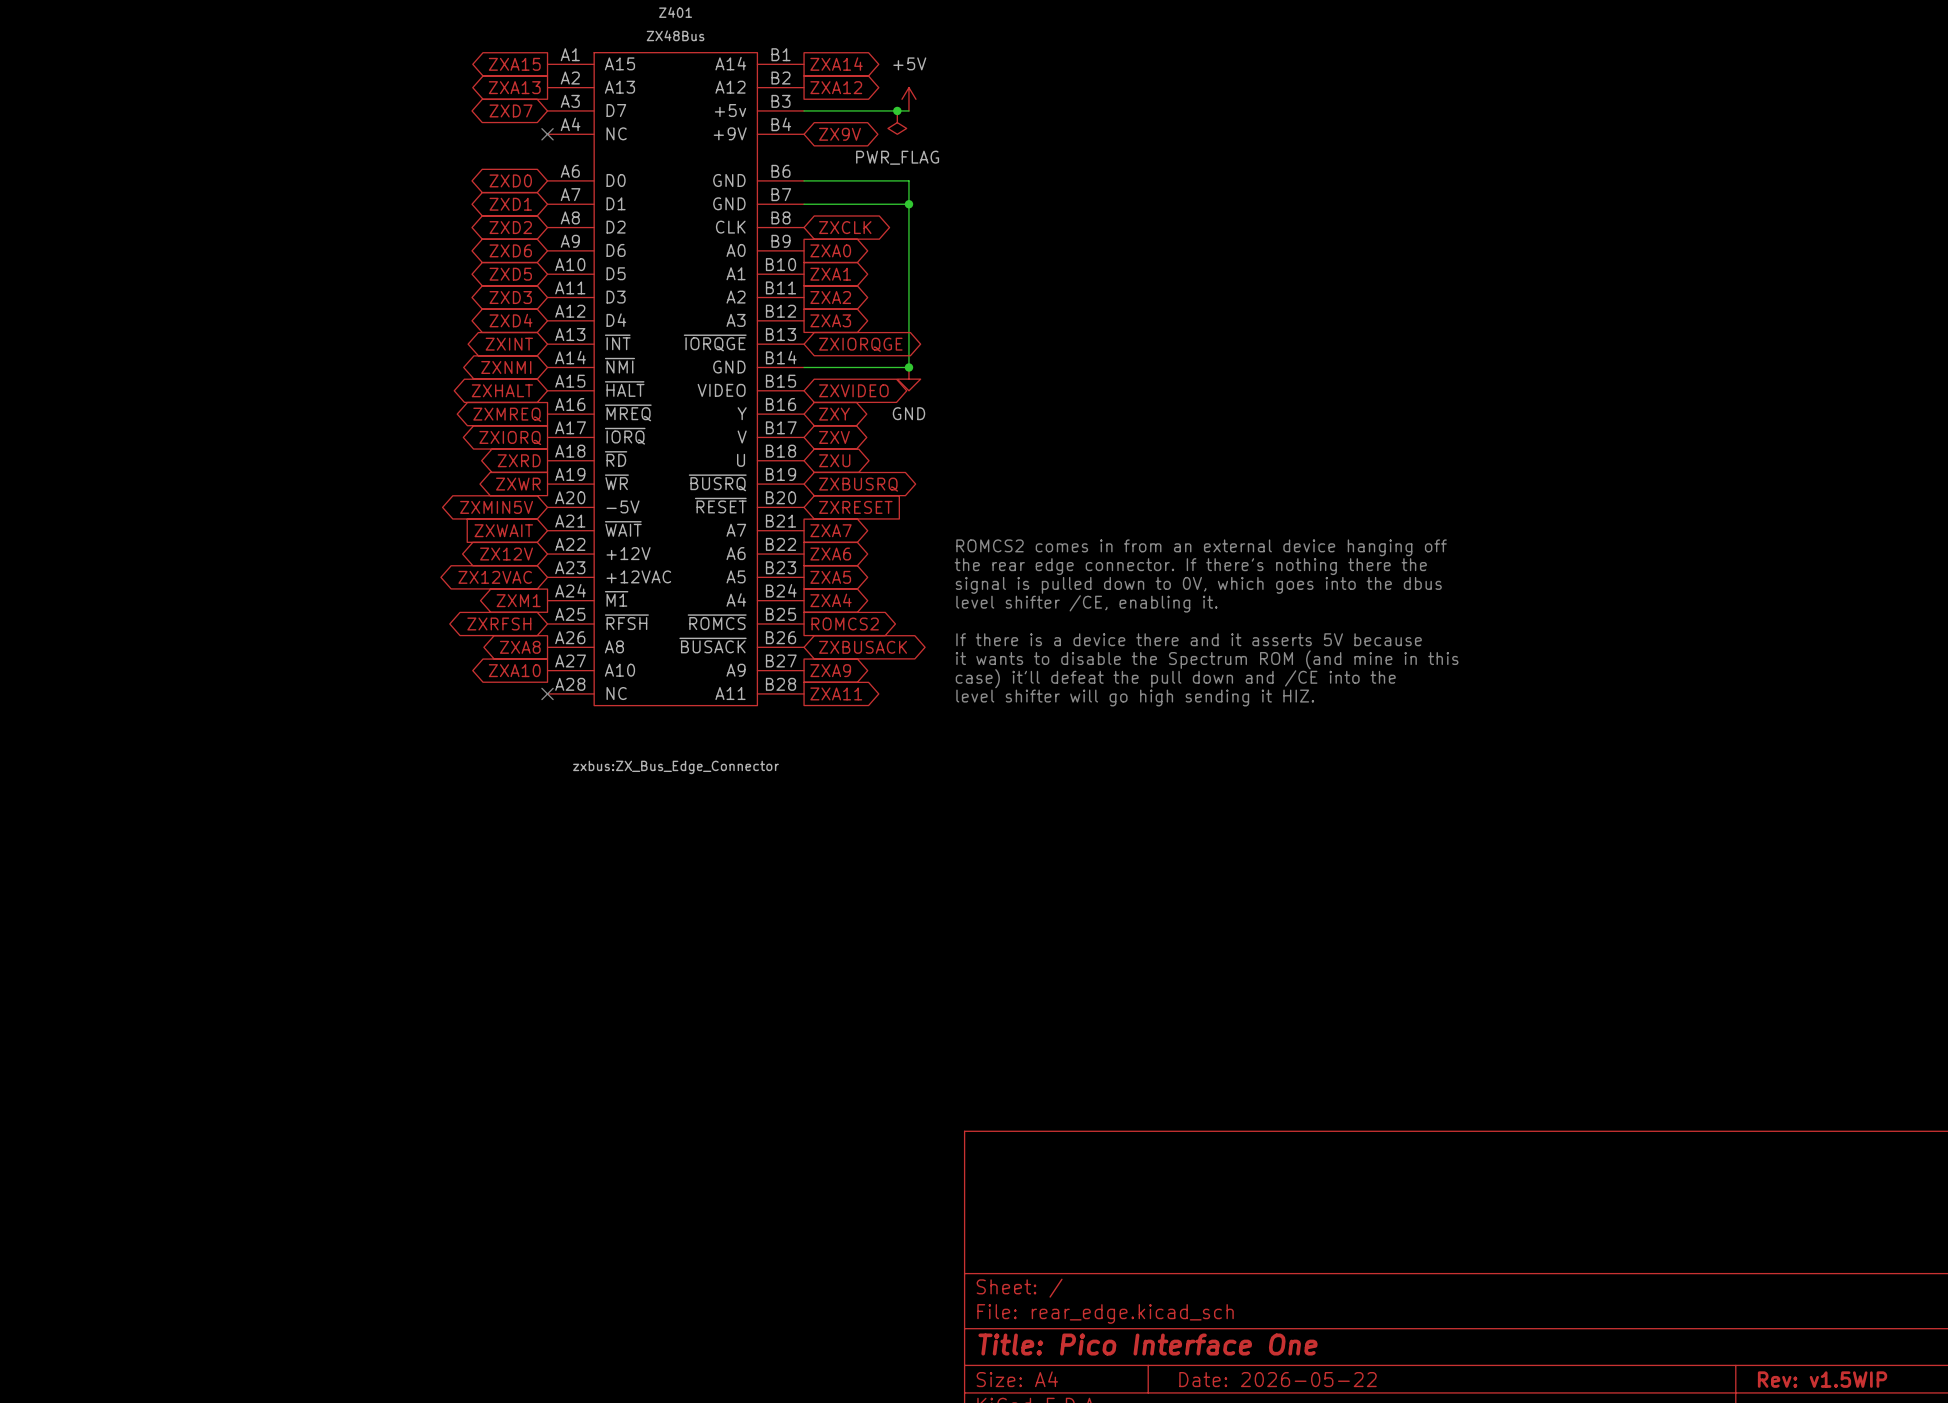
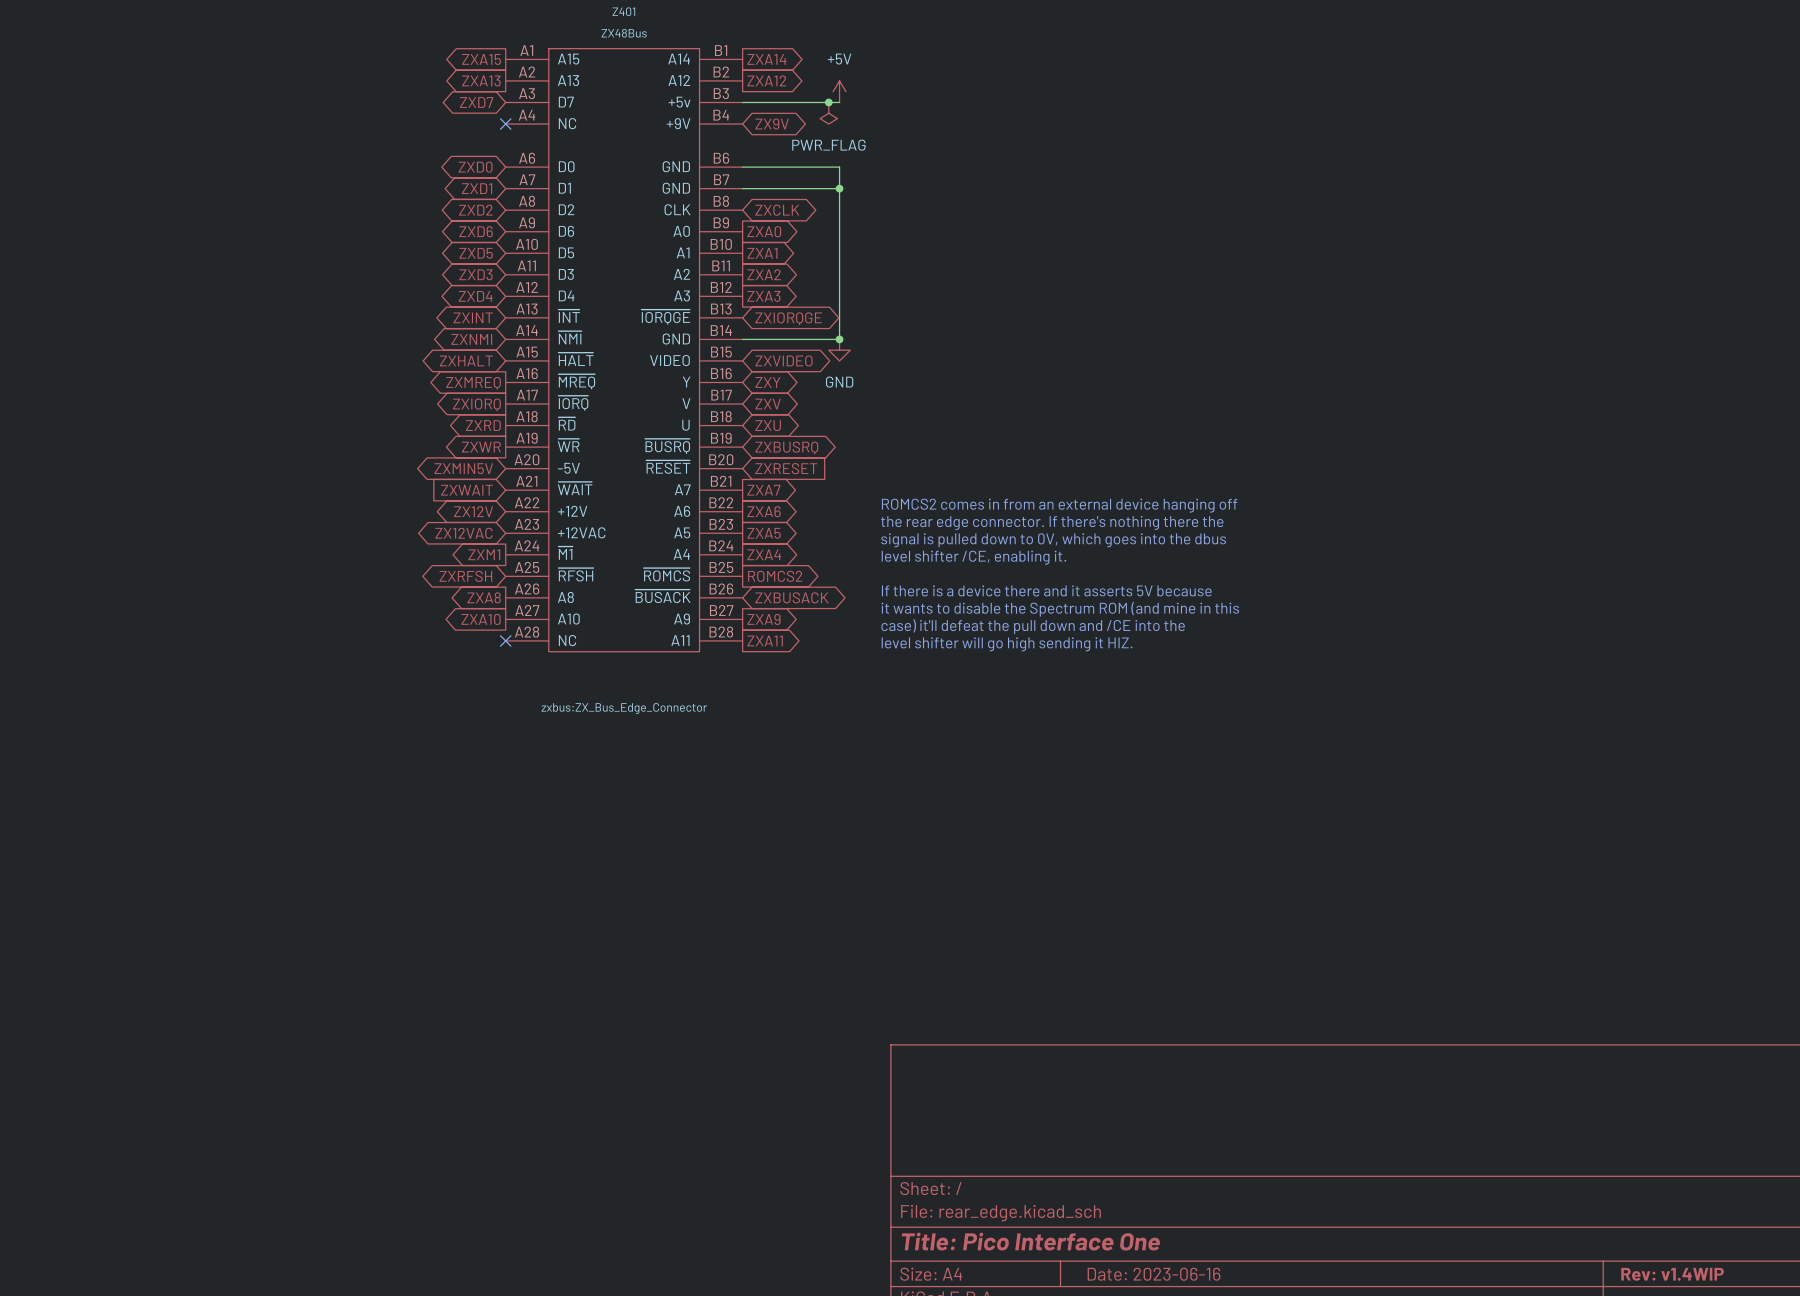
title block: Date: 2026-05-22 (1277, 1379) -> Date: 2023-06-16 (1154, 1274)
title block: Rev: v1.5WIP (1822, 1379) -> Rev: v1.4WIP (1672, 1274)

